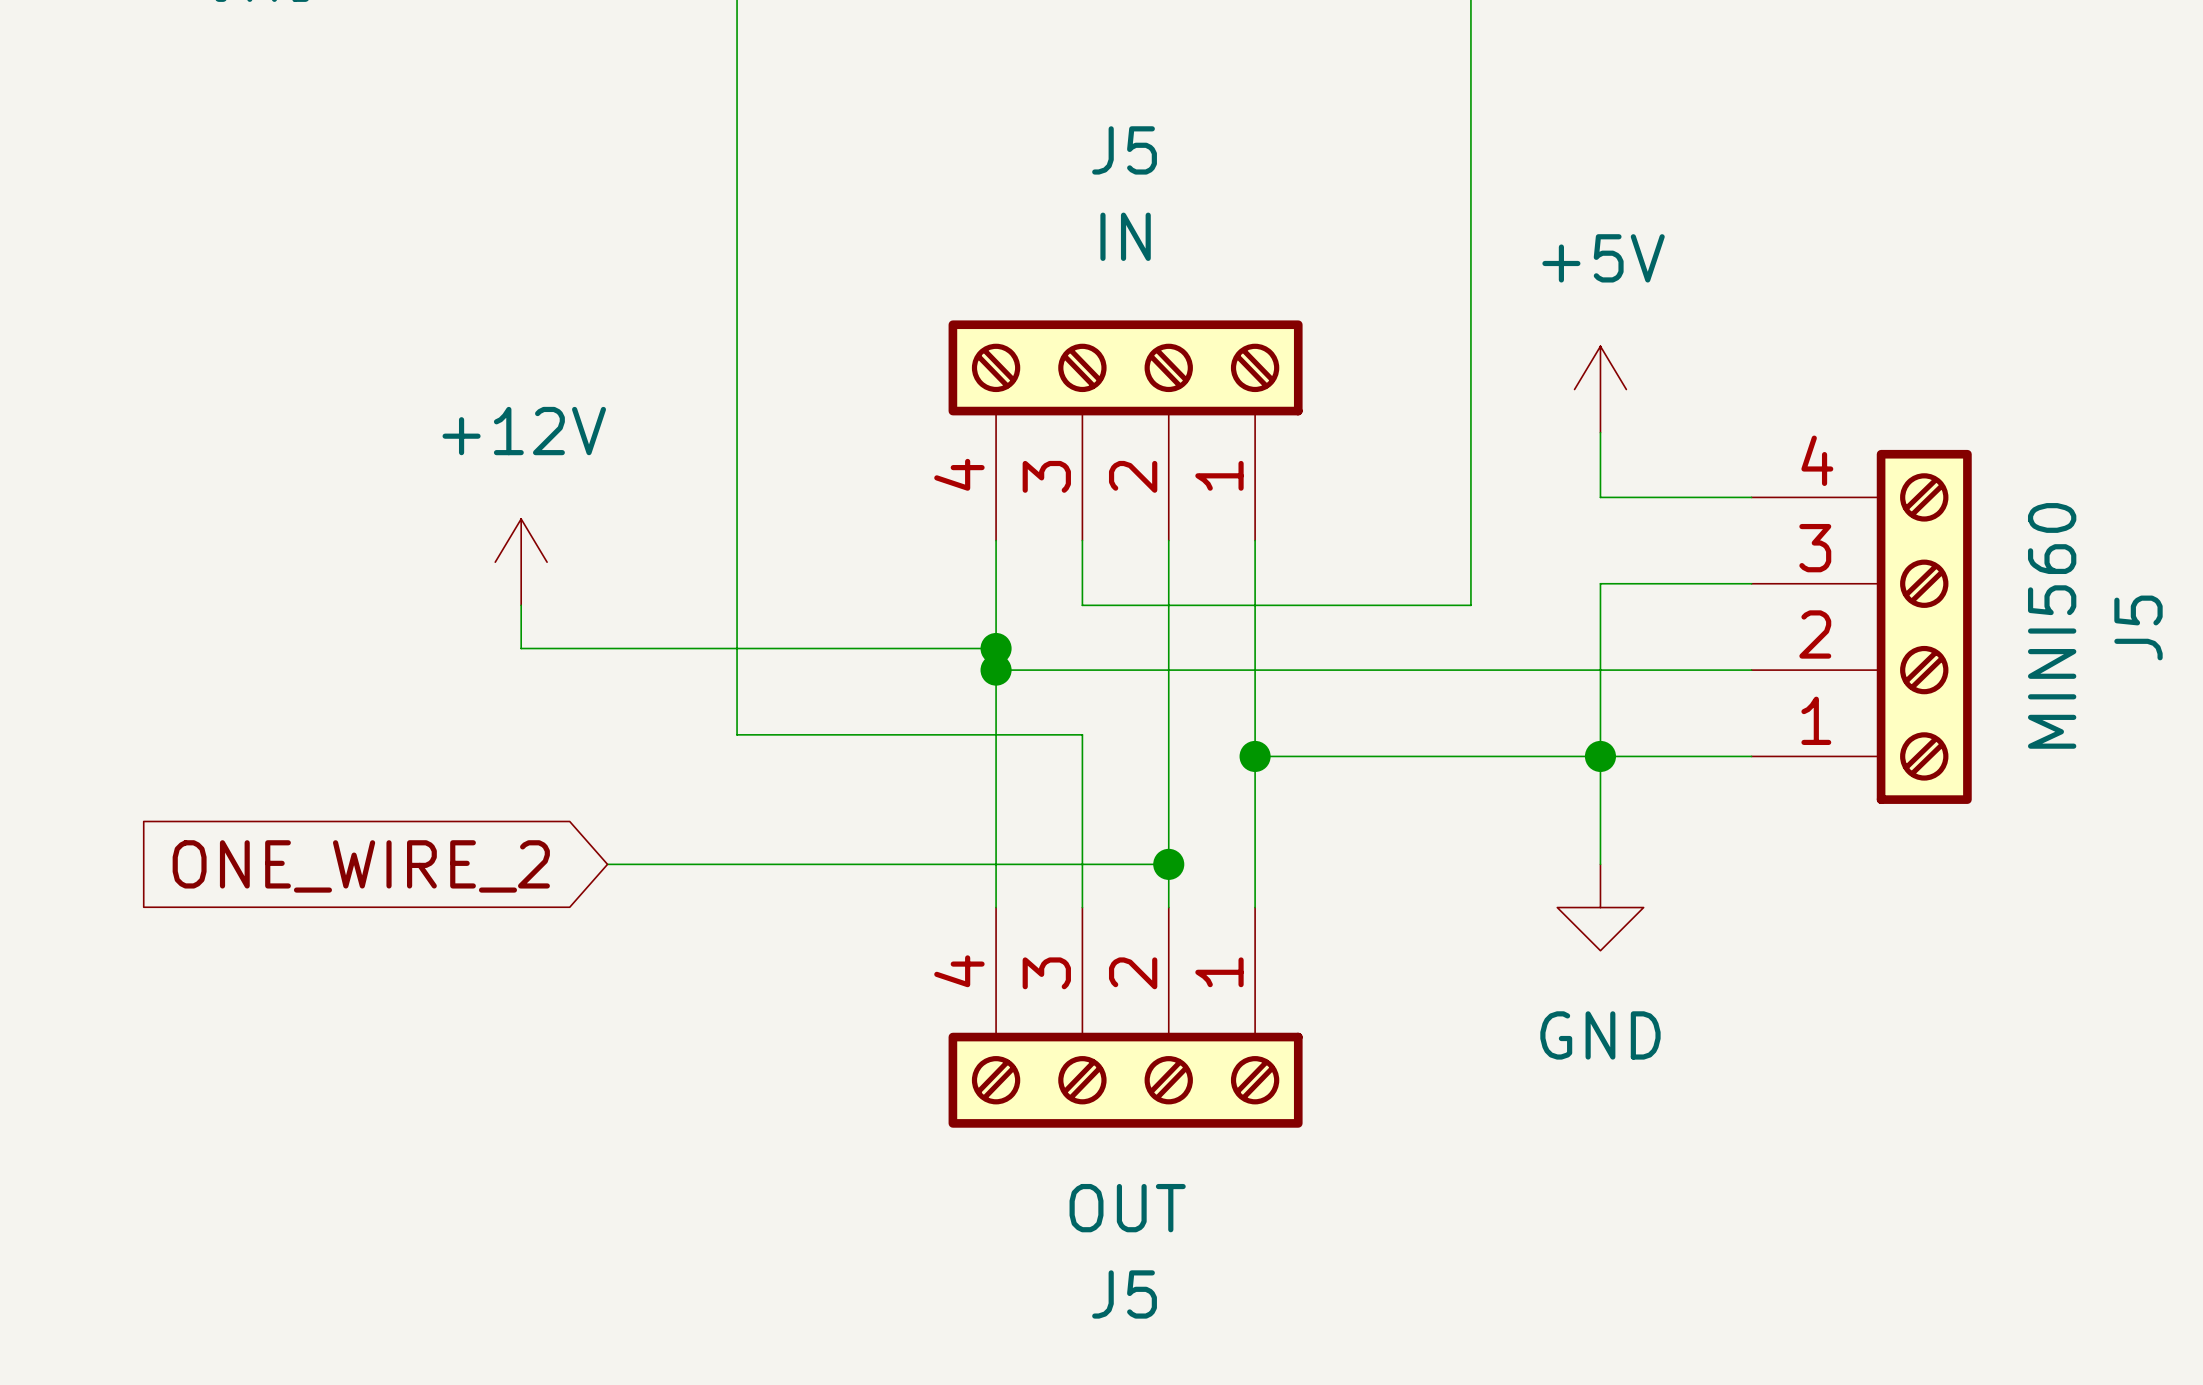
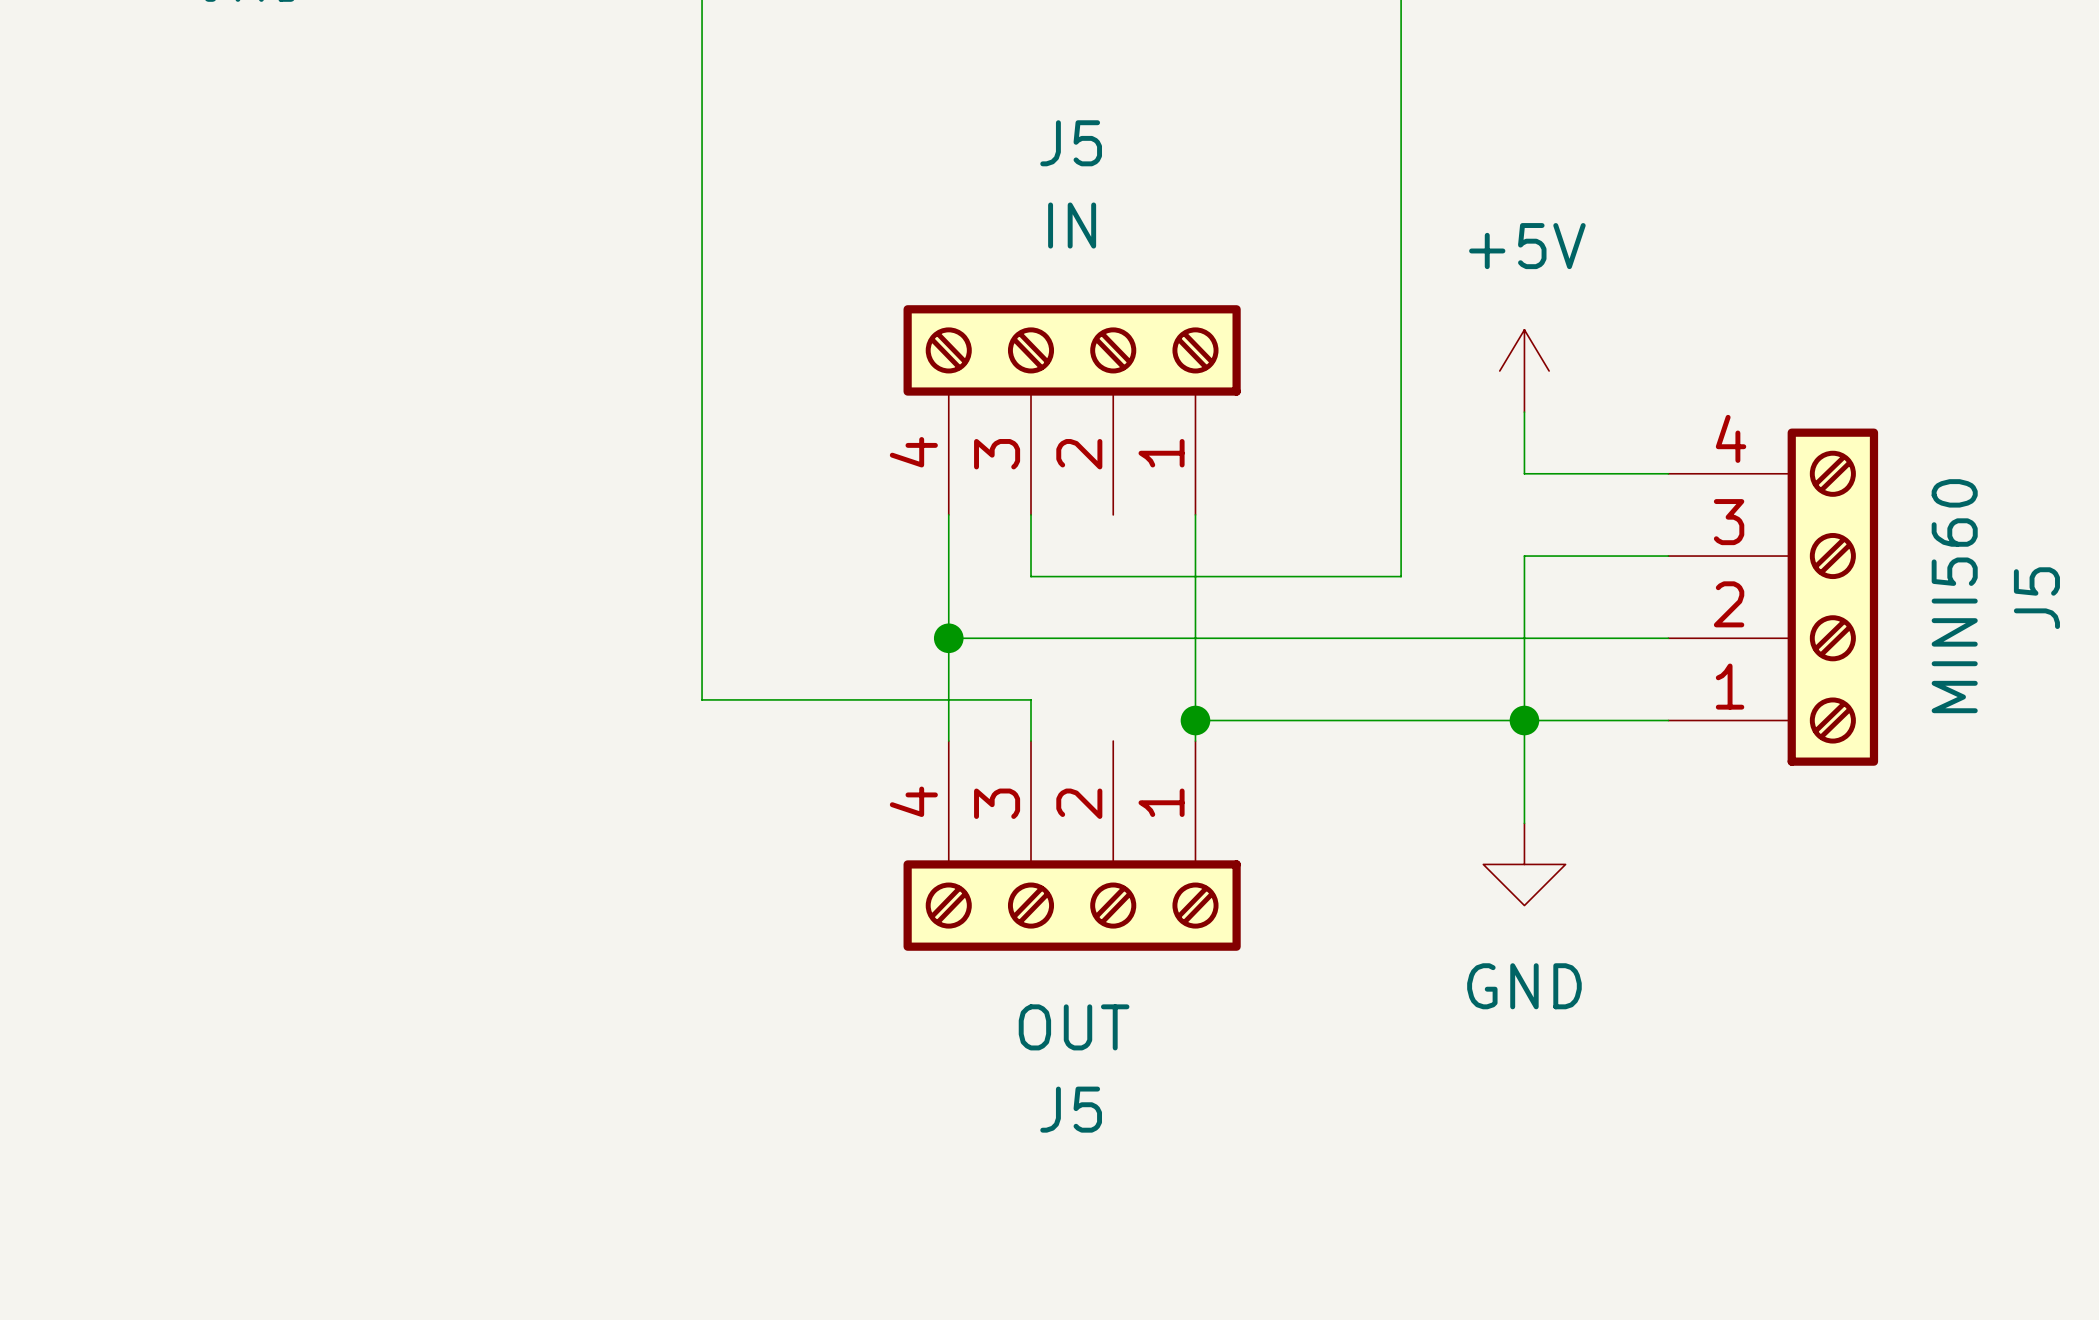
wire: (1168, 540) (1168, 907) -> none
power symbol: +12V (521, 562) -> none
wire: (521, 605) (521, 648) (996, 648) -> none
junction: (996, 648) -> none
wire: (607, 864) (1168, 864) -> none
junction: (1168, 864) -> none
global label: ONE_WIRE_2 (361, 866) -> none
J5 position: (1125, 1017) -> (1072, 845)

